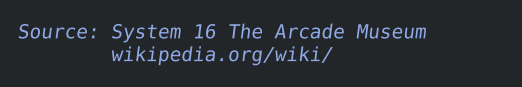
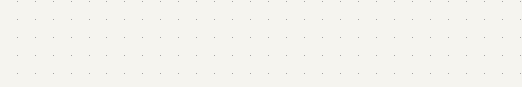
text: Source: System 16 The Arcade Museum (222, 33) -> none
text: wikipedia.org/wiki/ (222, 55) -> none

